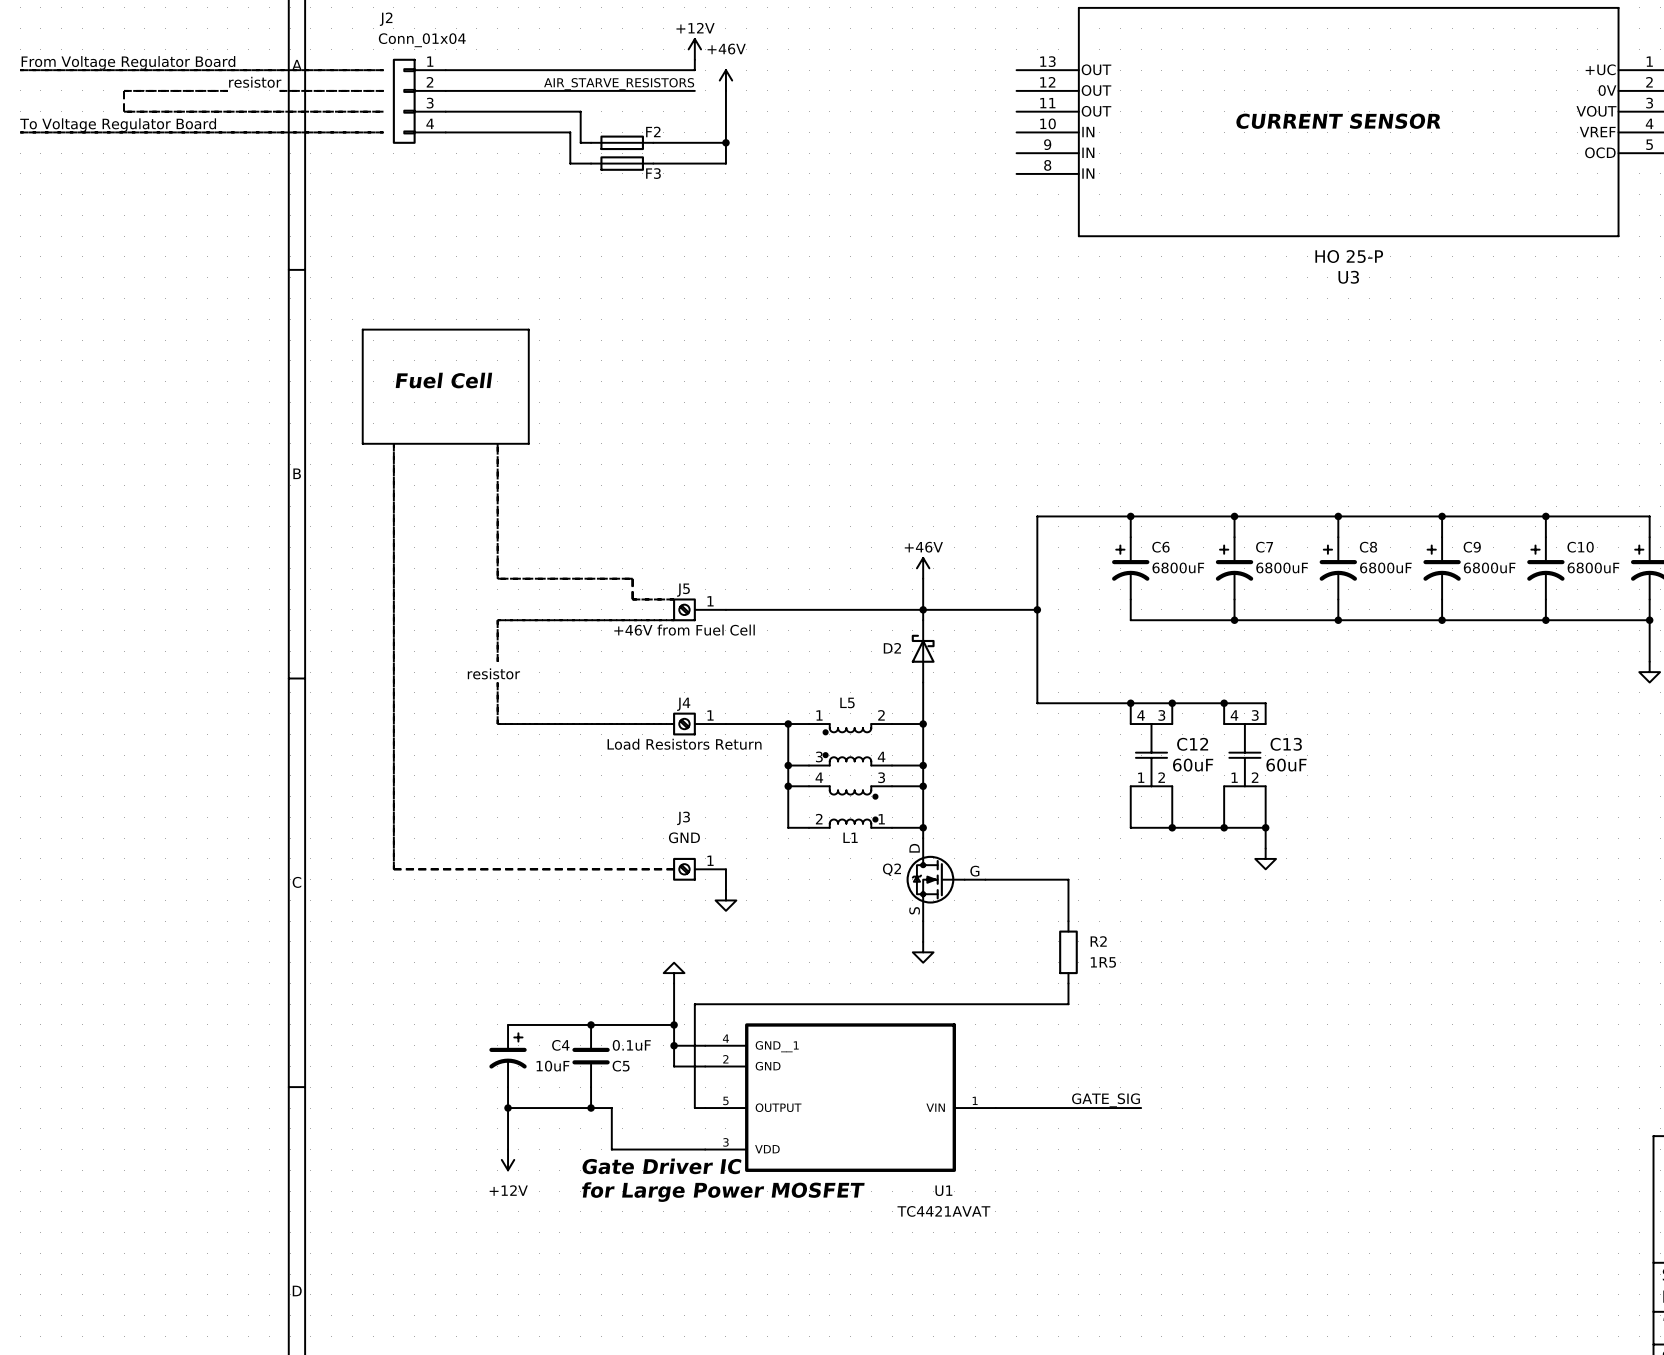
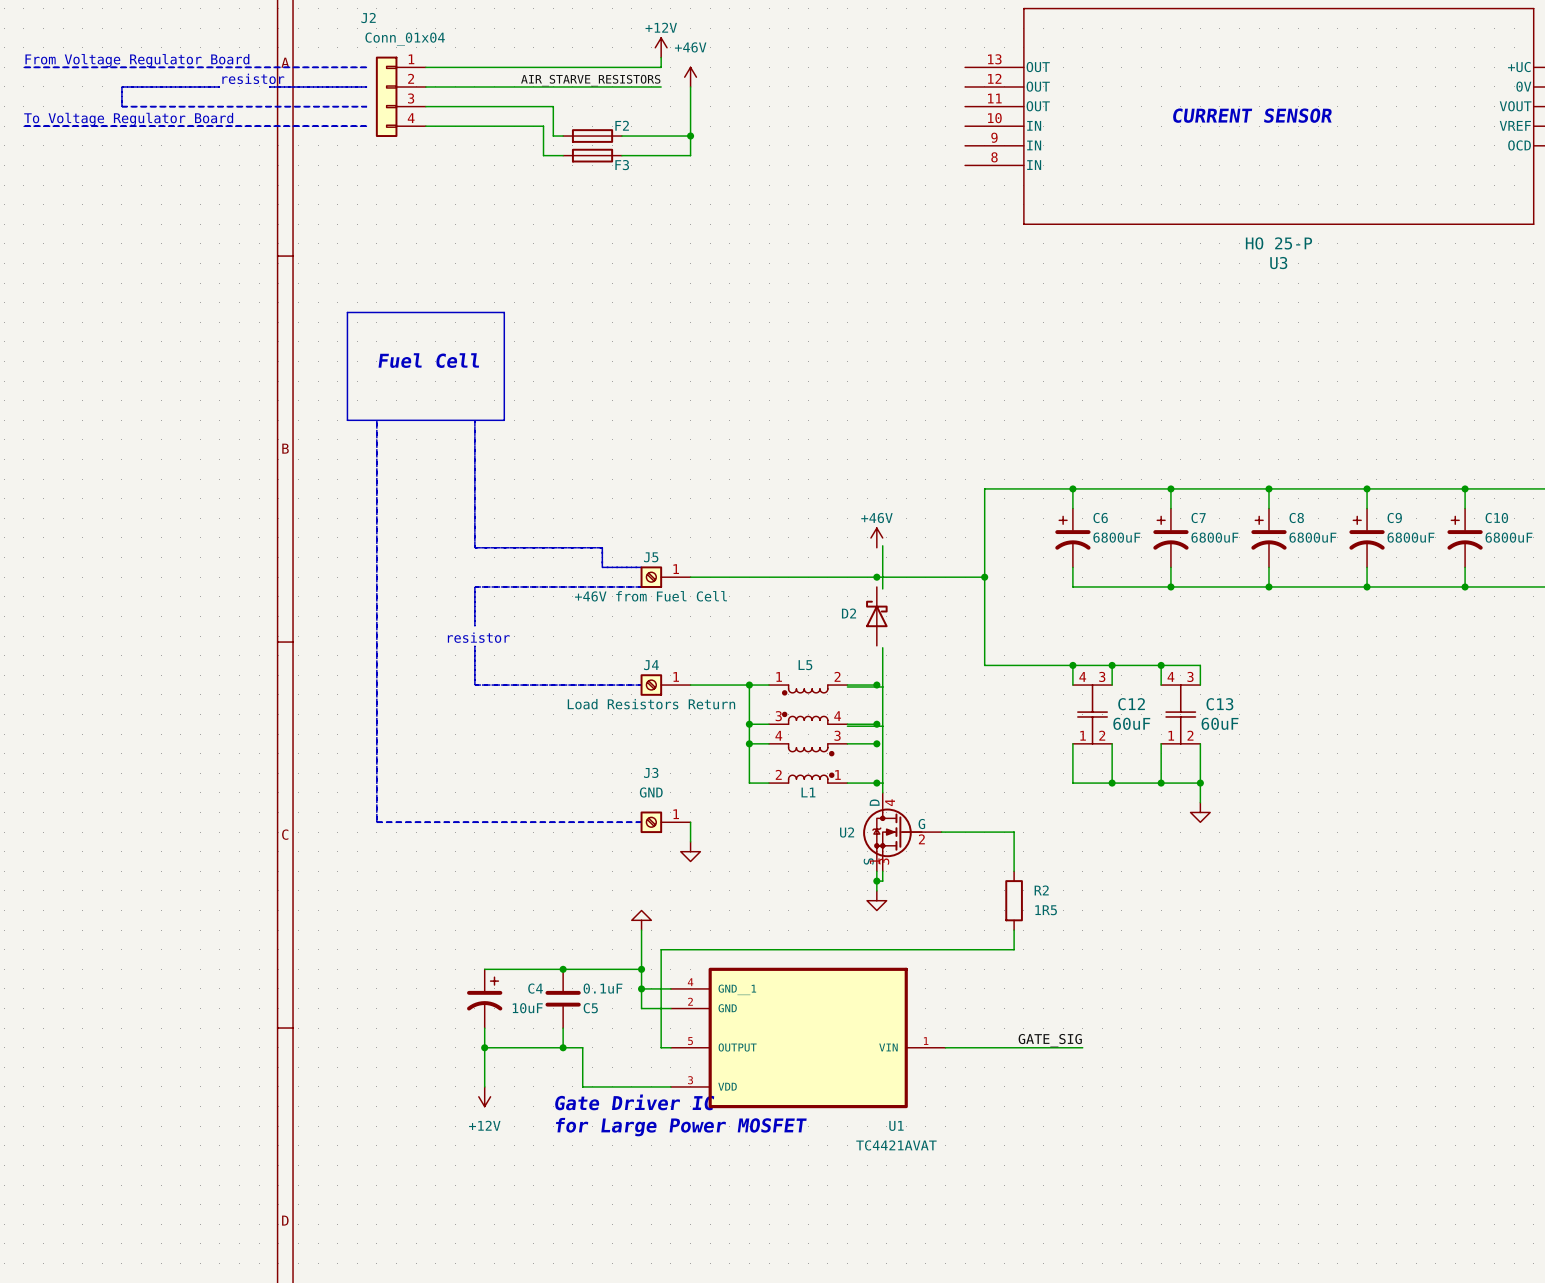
wire: none -> (882, 545) (882, 588)
wire: (923, 578) (923, 620) -> none
wire: (923, 682) (923, 838) -> none
wire: none -> (882, 647) (882, 792)
wire: none -> (847, 686) (882, 686)
wire: none -> (847, 726) (882, 726)
Q2: (946, 879) -> none
U2: none -> (902, 832)
wire: none -> (882, 871) (882, 881) (876, 881)
junction: none -> (876, 881)

